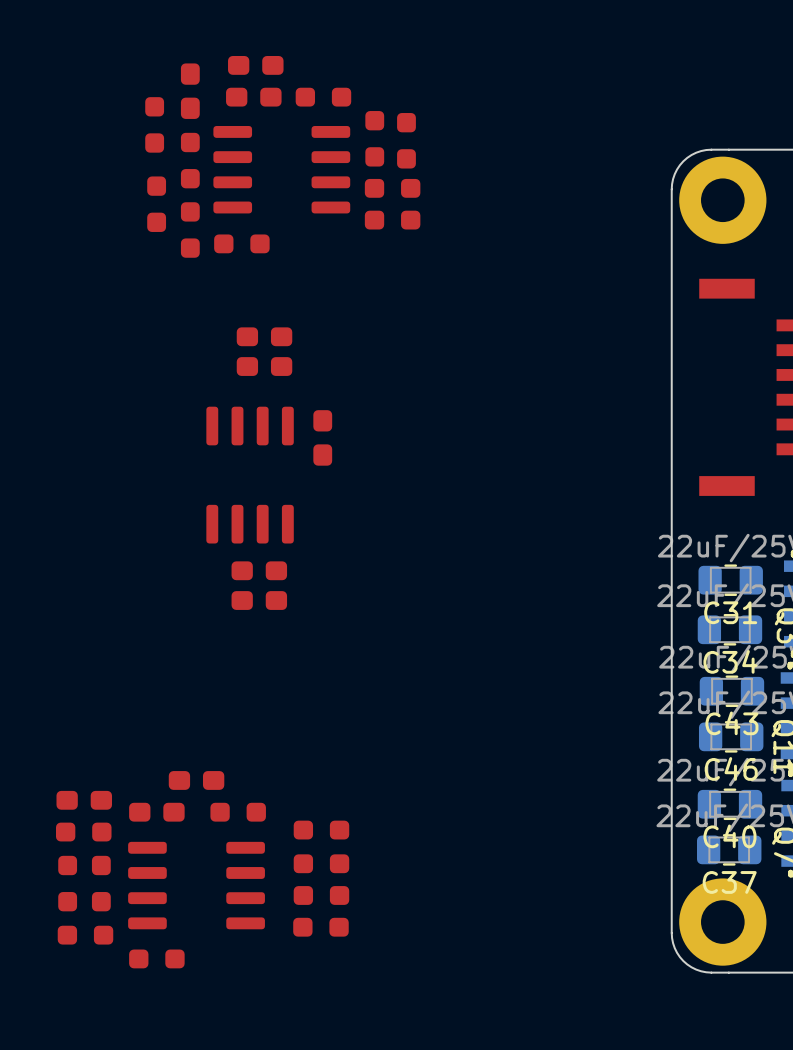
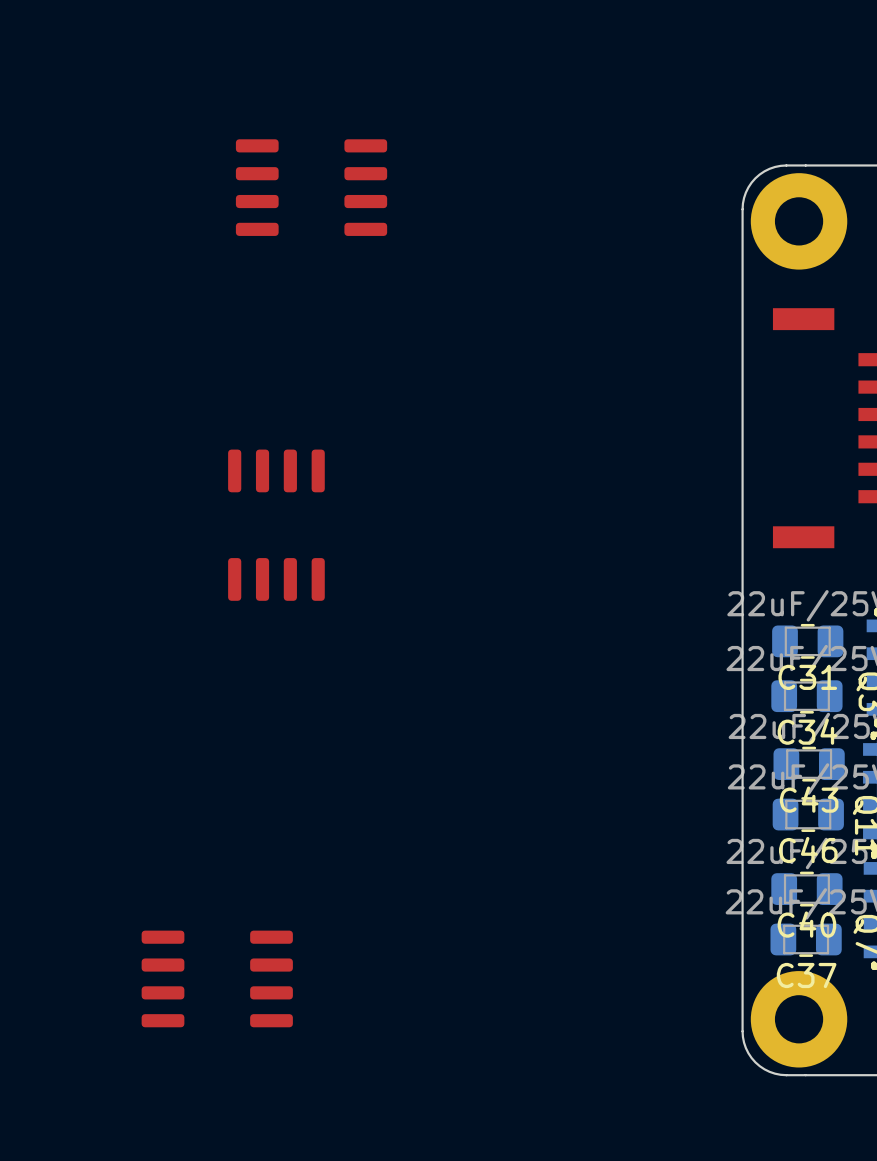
part: (255, 65) -> none
part: (190, 91) -> none
part: (253, 97) -> none
part: (323, 97) -> none
part: (154, 124) -> none
part: (374, 138) -> none
part: (406, 140) -> none
part: (190, 160) -> none
part: (392, 188) -> none
part: (156, 204) -> none
part: (392, 220) -> none
part: (190, 230) -> none
part: (241, 243) -> none
part: (264, 336) -> none
part: (264, 366) -> none
part: (322, 437) -> none
part: (259, 570) -> none
part: (259, 600) -> none
part: (196, 780) -> none
part: (84, 800) -> none
part: (156, 812) -> none
part: (238, 812) -> none
part: (321, 830) -> none
part: (83, 832) -> none
part: (321, 863) -> none
part: (67, 883) -> none
part: (101, 883) -> none
part: (321, 895) -> none
part: (320, 927) -> none
part: (85, 935) -> none
part: (156, 958) -> none

